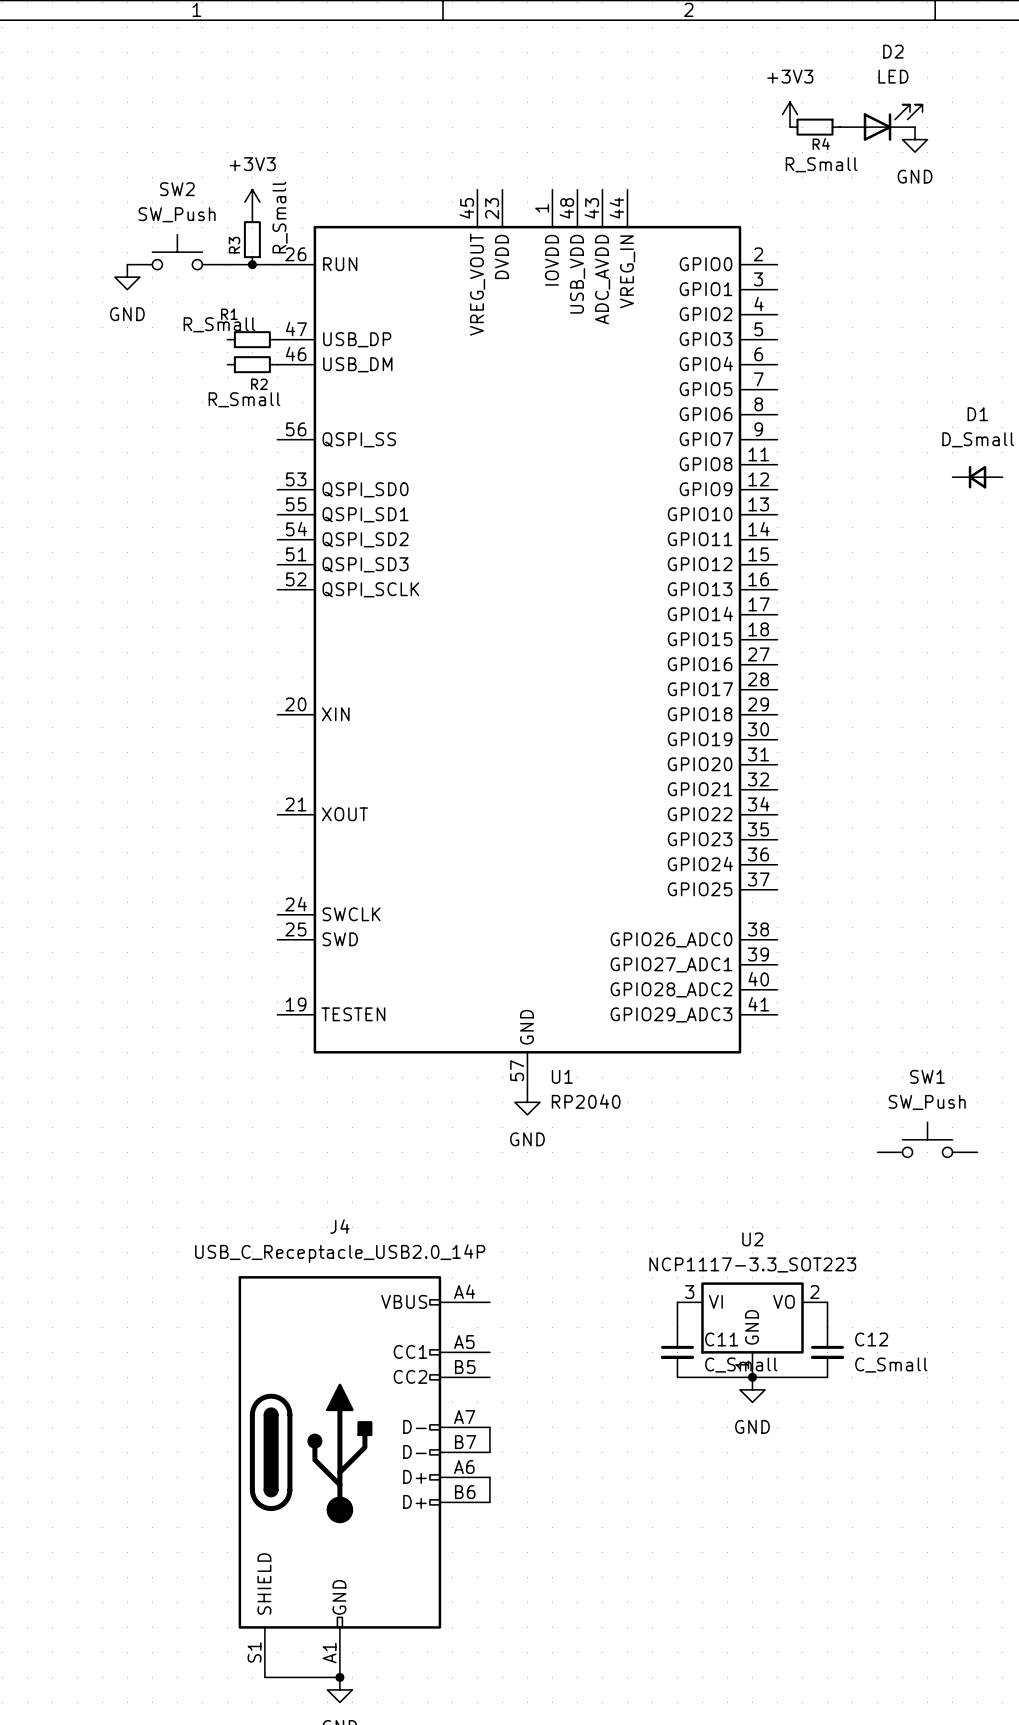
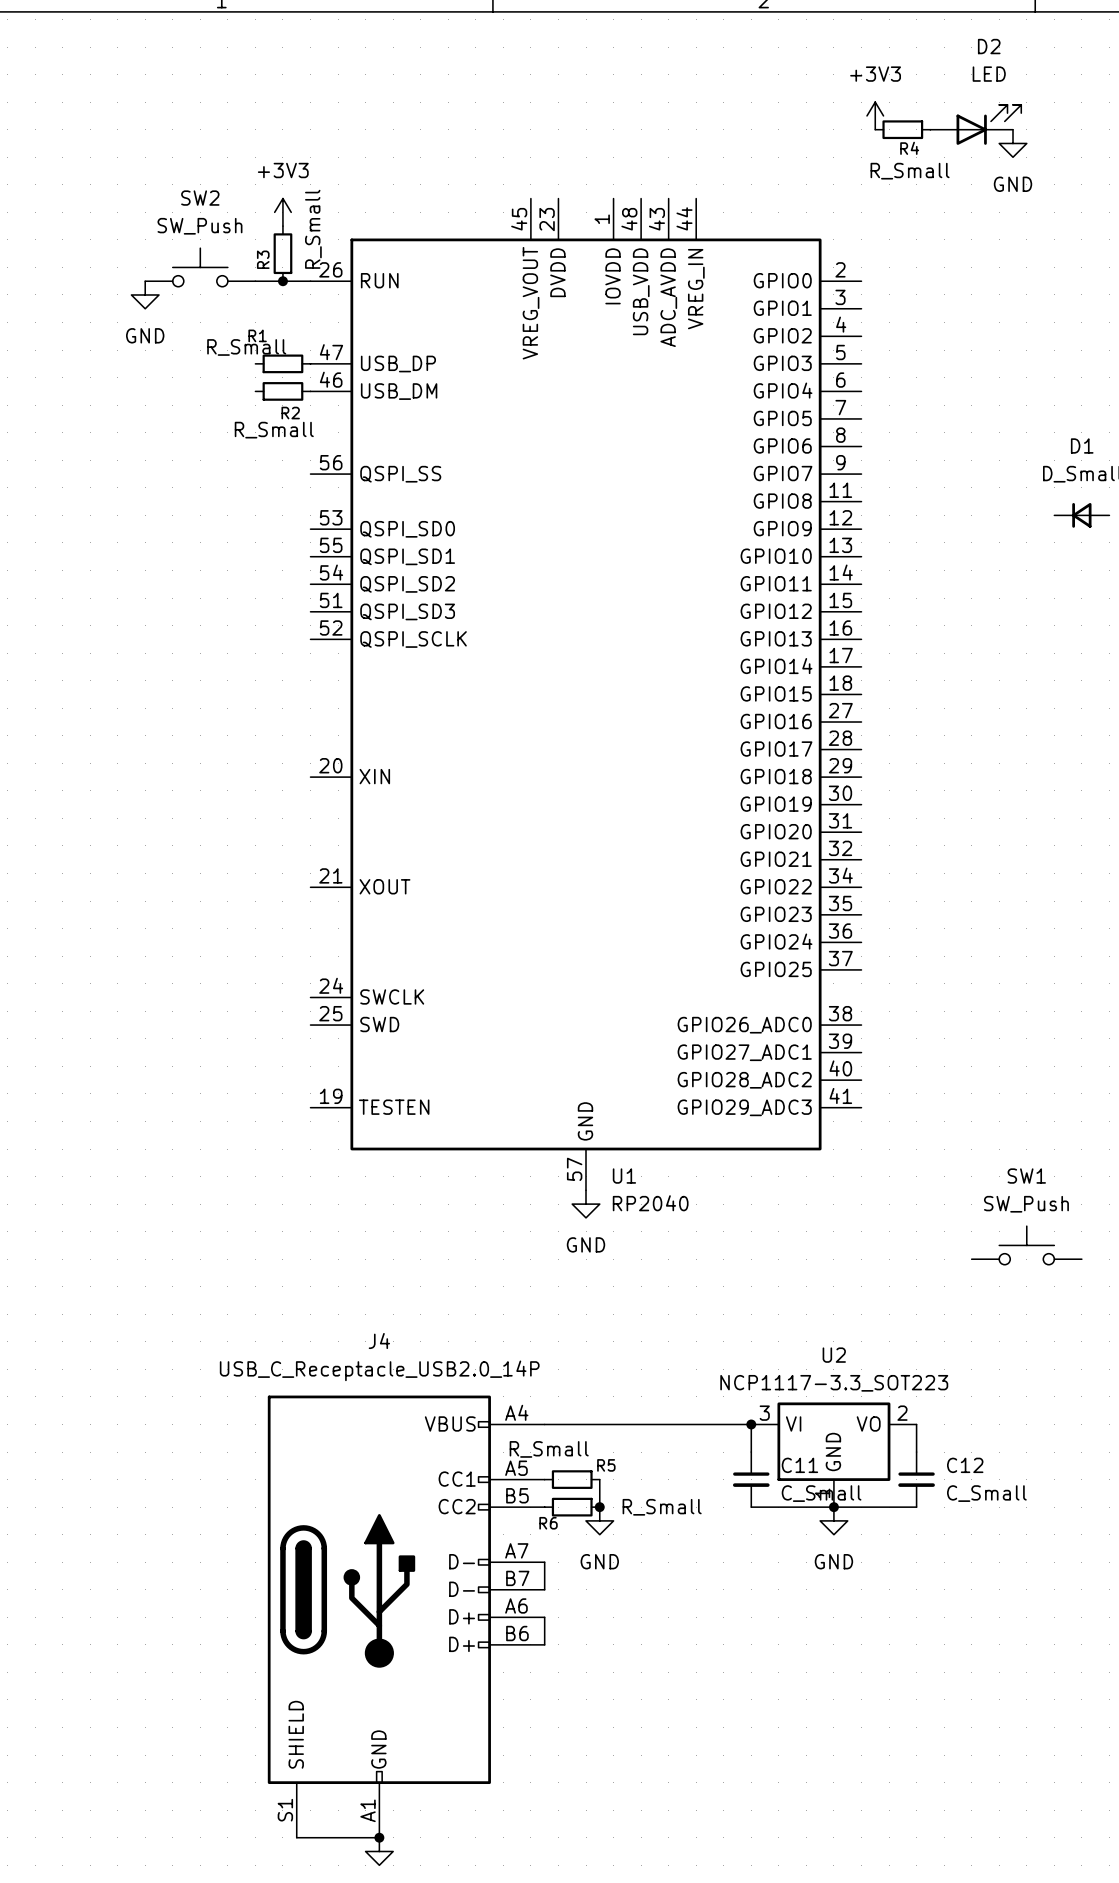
wire: none -> (544, 1424) (751, 1424)
junction: none -> (751, 1424)
R5: none -> R_Small (572, 1479)
wire: none -> (599, 1479) (599, 1507)
R6: none -> R_Small (572, 1507)
junction: none -> (599, 1507)
power symbol: none -> GND (599, 1520)

